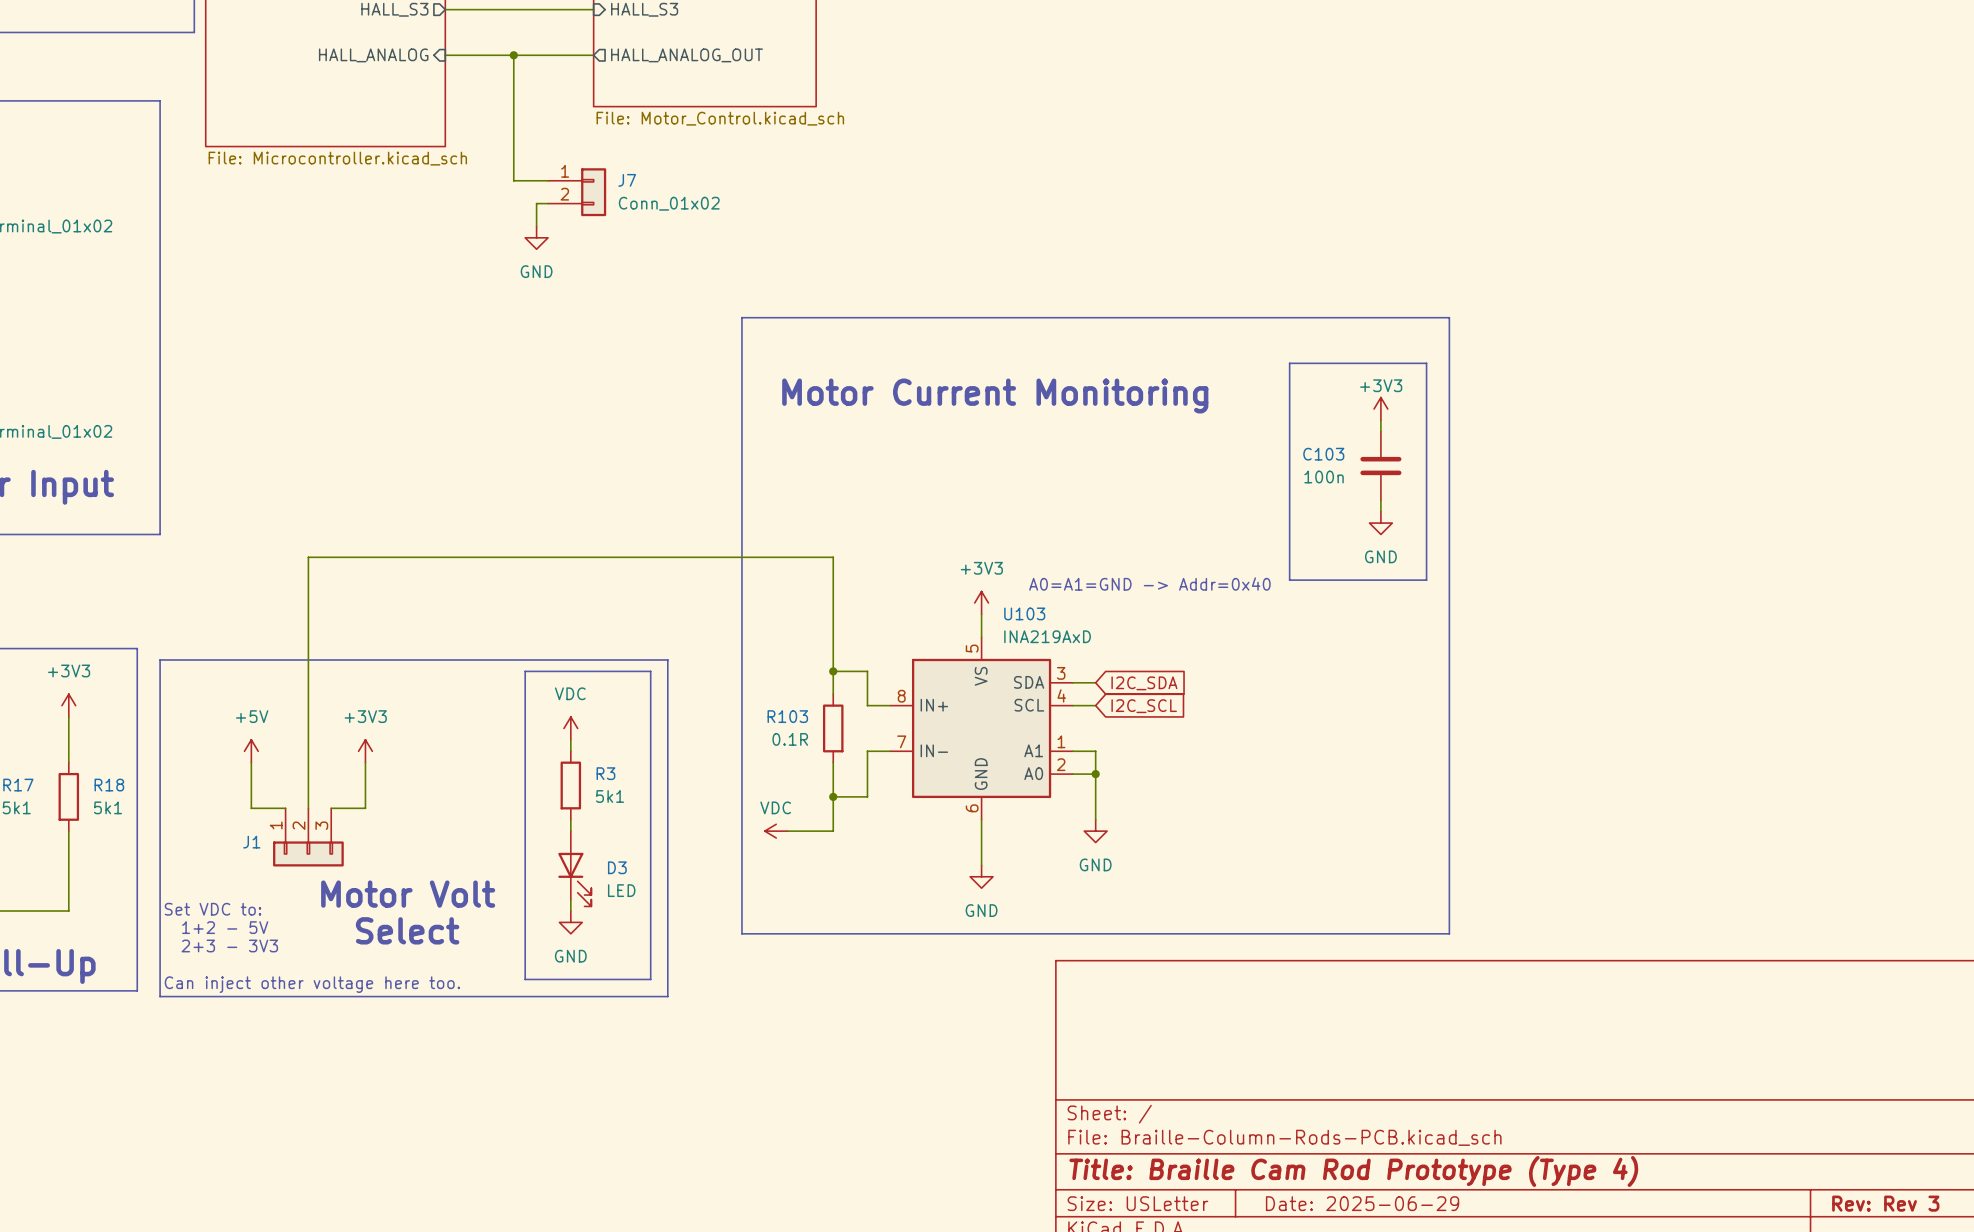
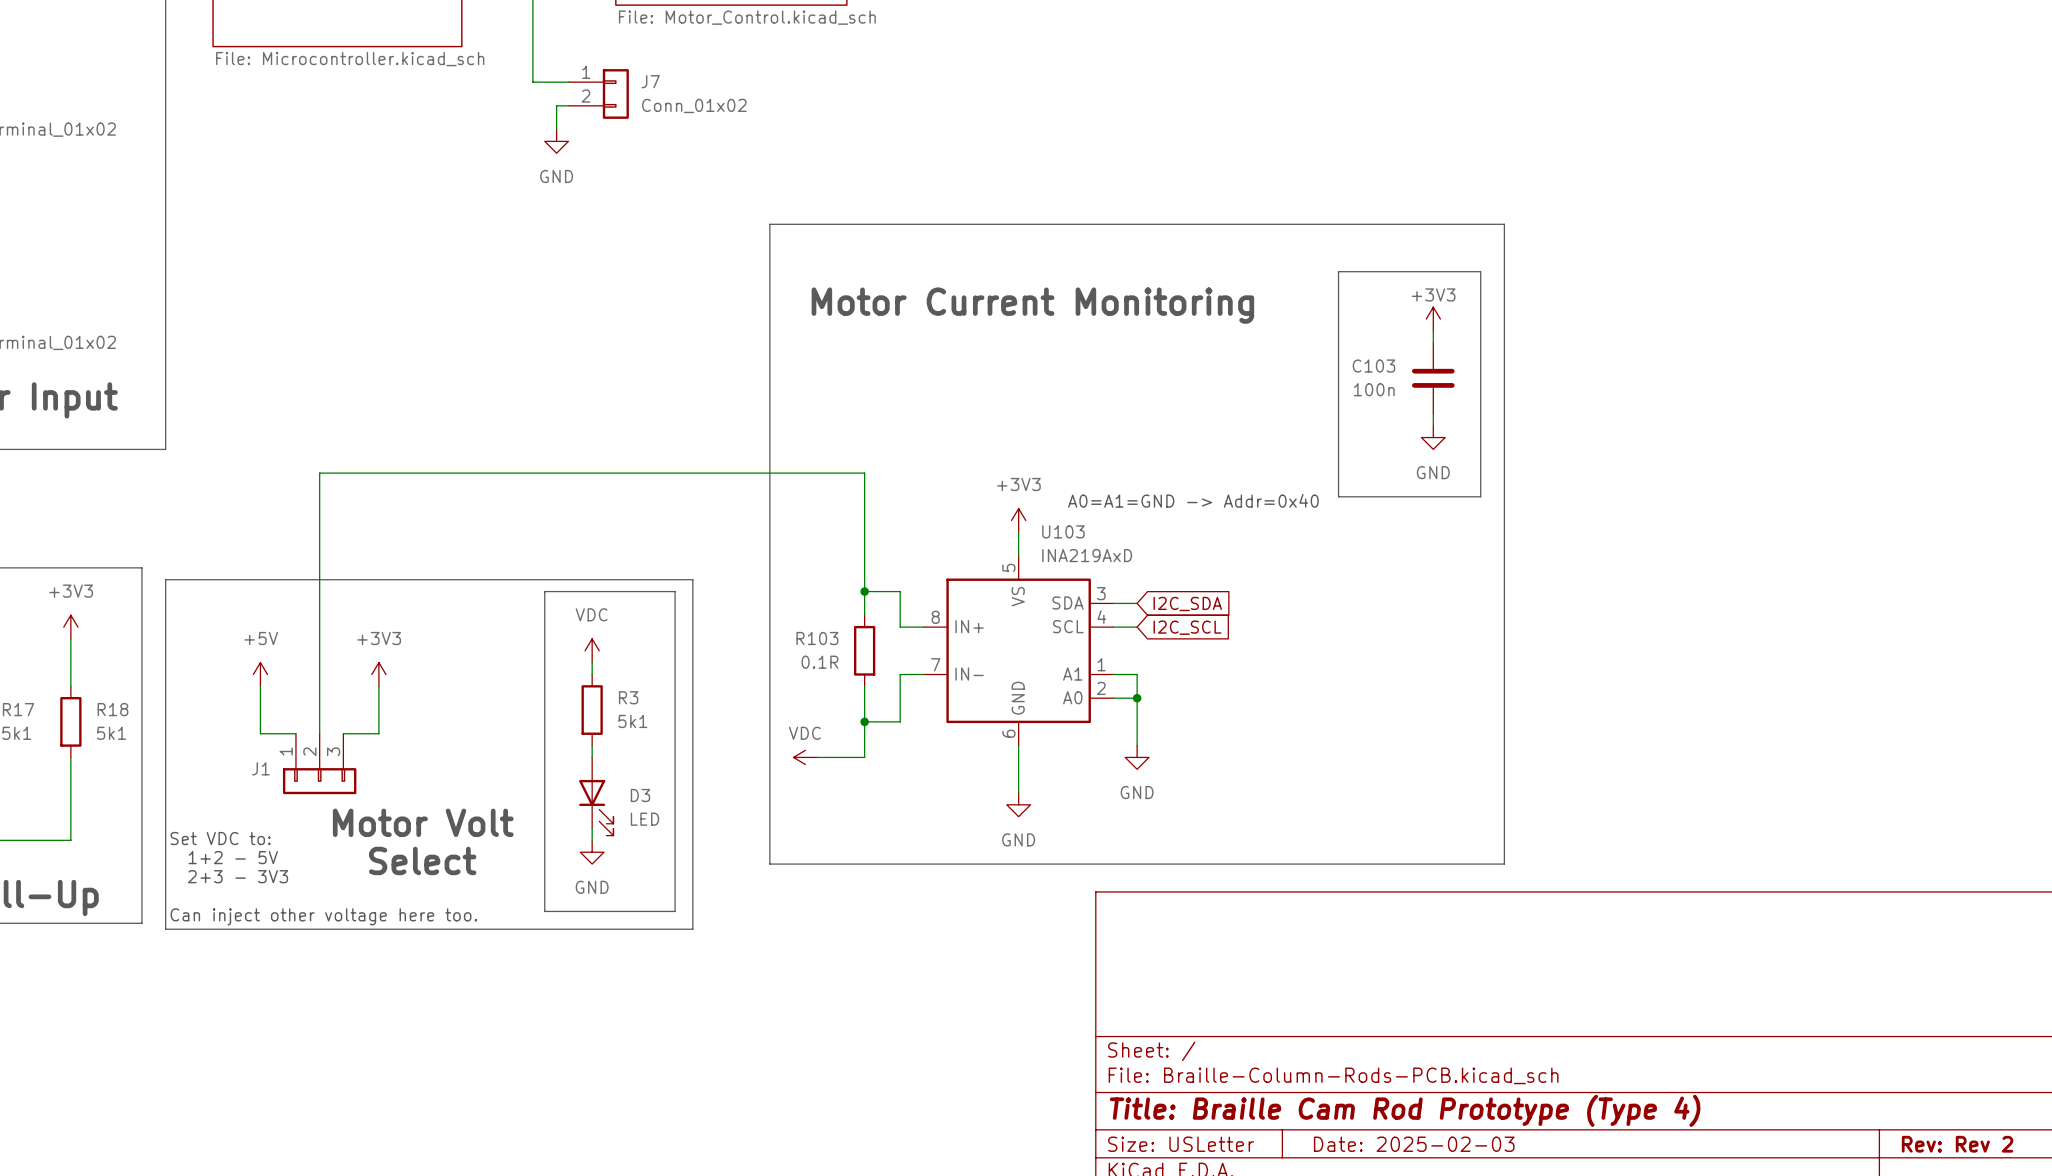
title block: Date: 2025-06-29 (1362, 1203) -> Date: 2025-02-03 (1414, 1144)
title block: Rev: Rev 3 (1885, 1203) -> Rev: Rev 2 (1957, 1144)

